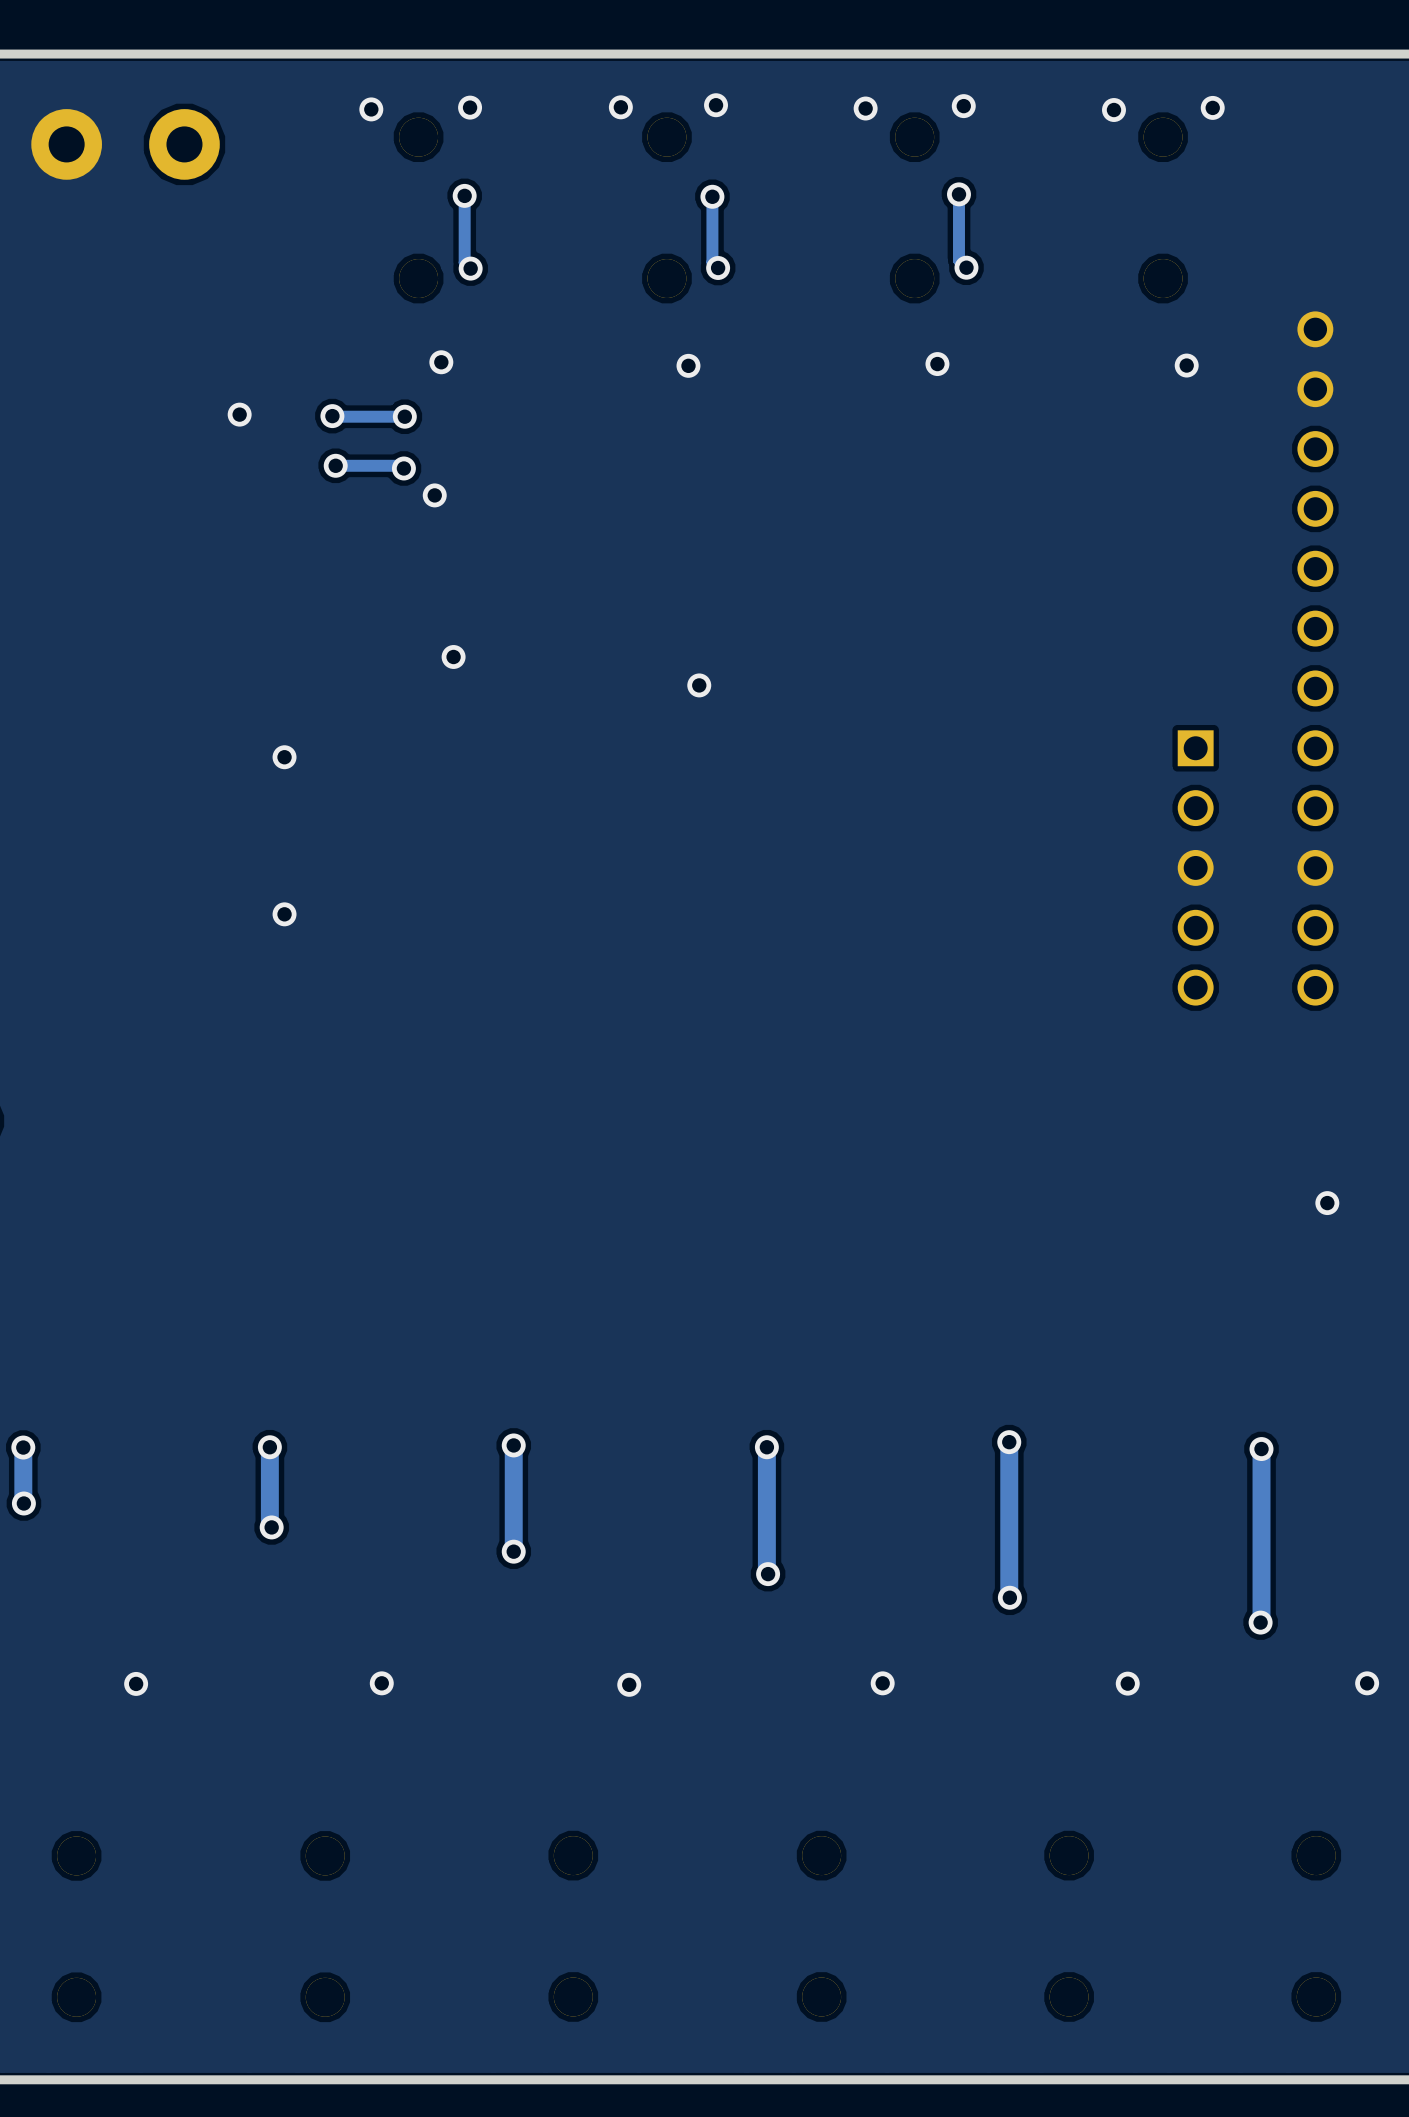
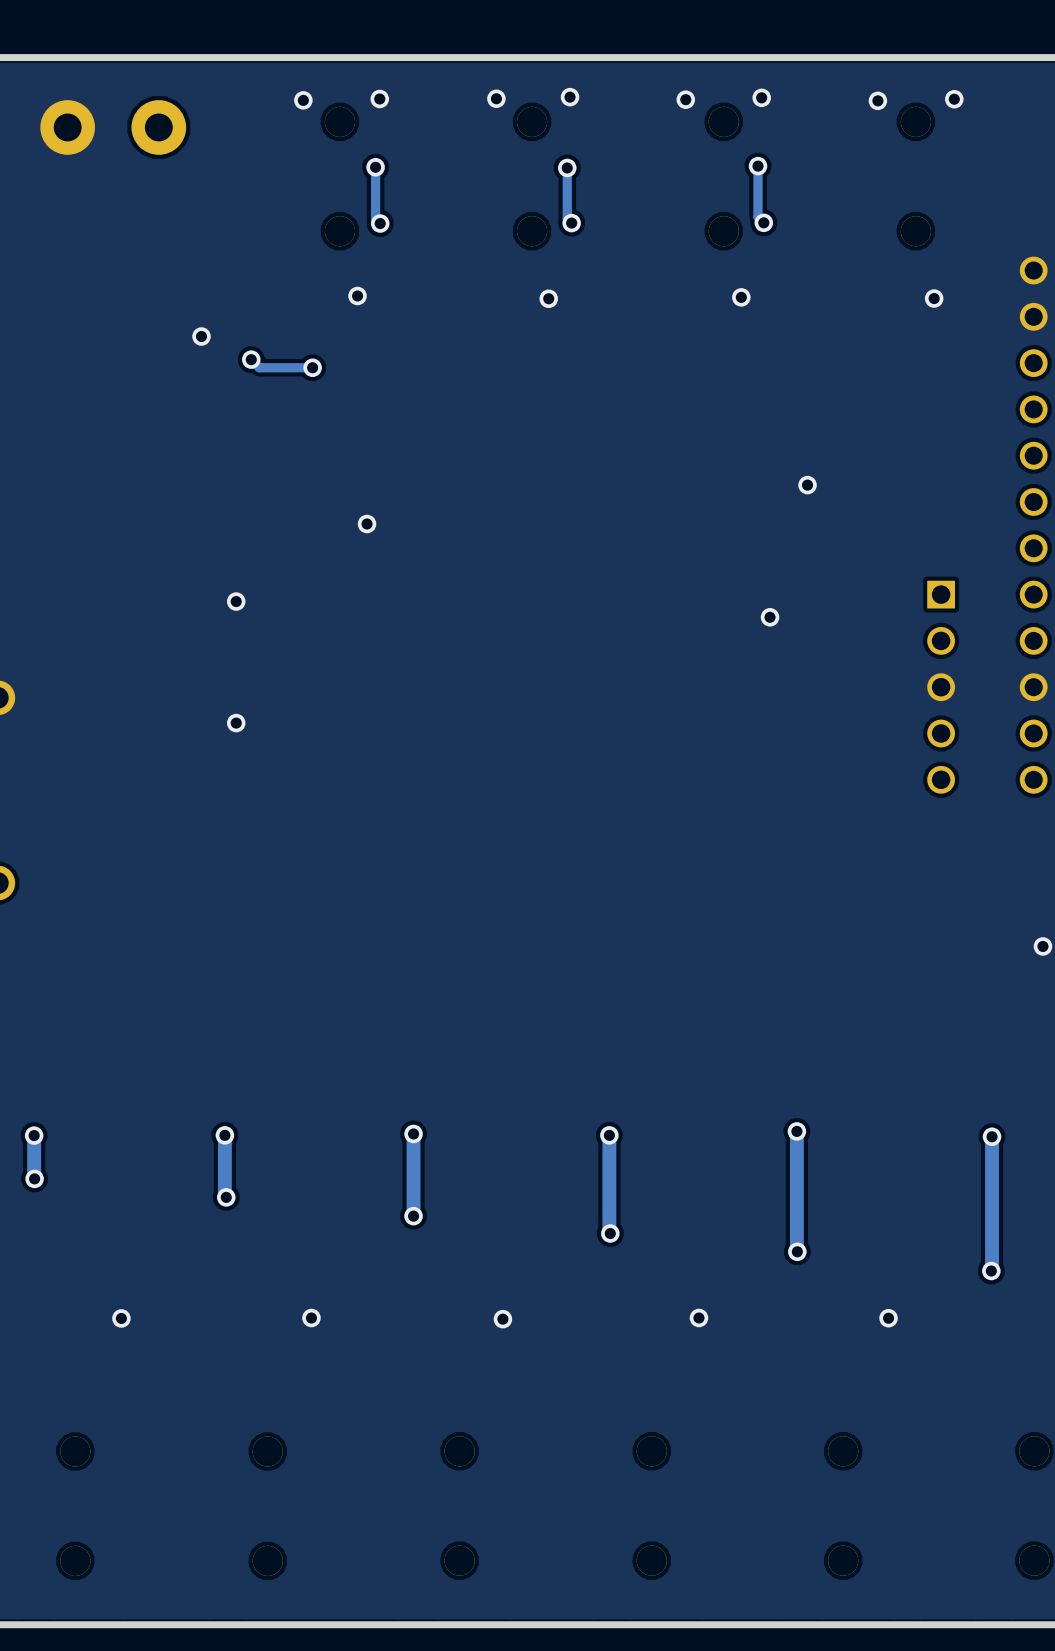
track: (332, 416) (404, 416) -> none
via: (332, 416) -> none
via: (404, 416) -> none
track: none -> (251, 359) (259, 367) (312, 367)
via: none -> (251, 359)
via: none -> (312, 367)
track: (335, 465) (401, 465) (403, 468) -> none
via: (335, 465) -> none
via: (403, 468) -> none
via: (434, 495) -> none
via: none -> (807, 485)
via: (699, 685) -> none
via: none -> (770, 617)

